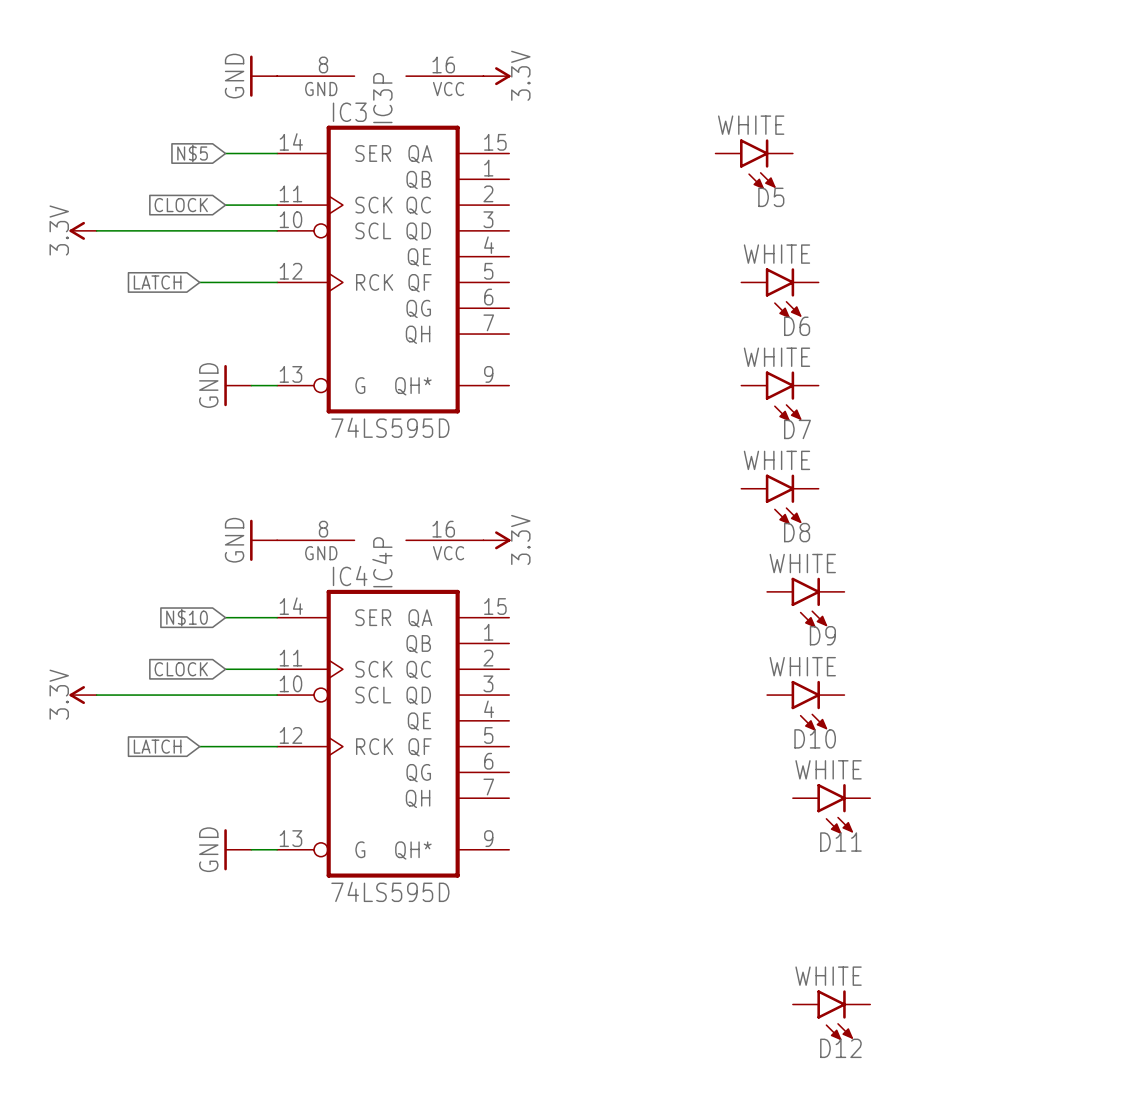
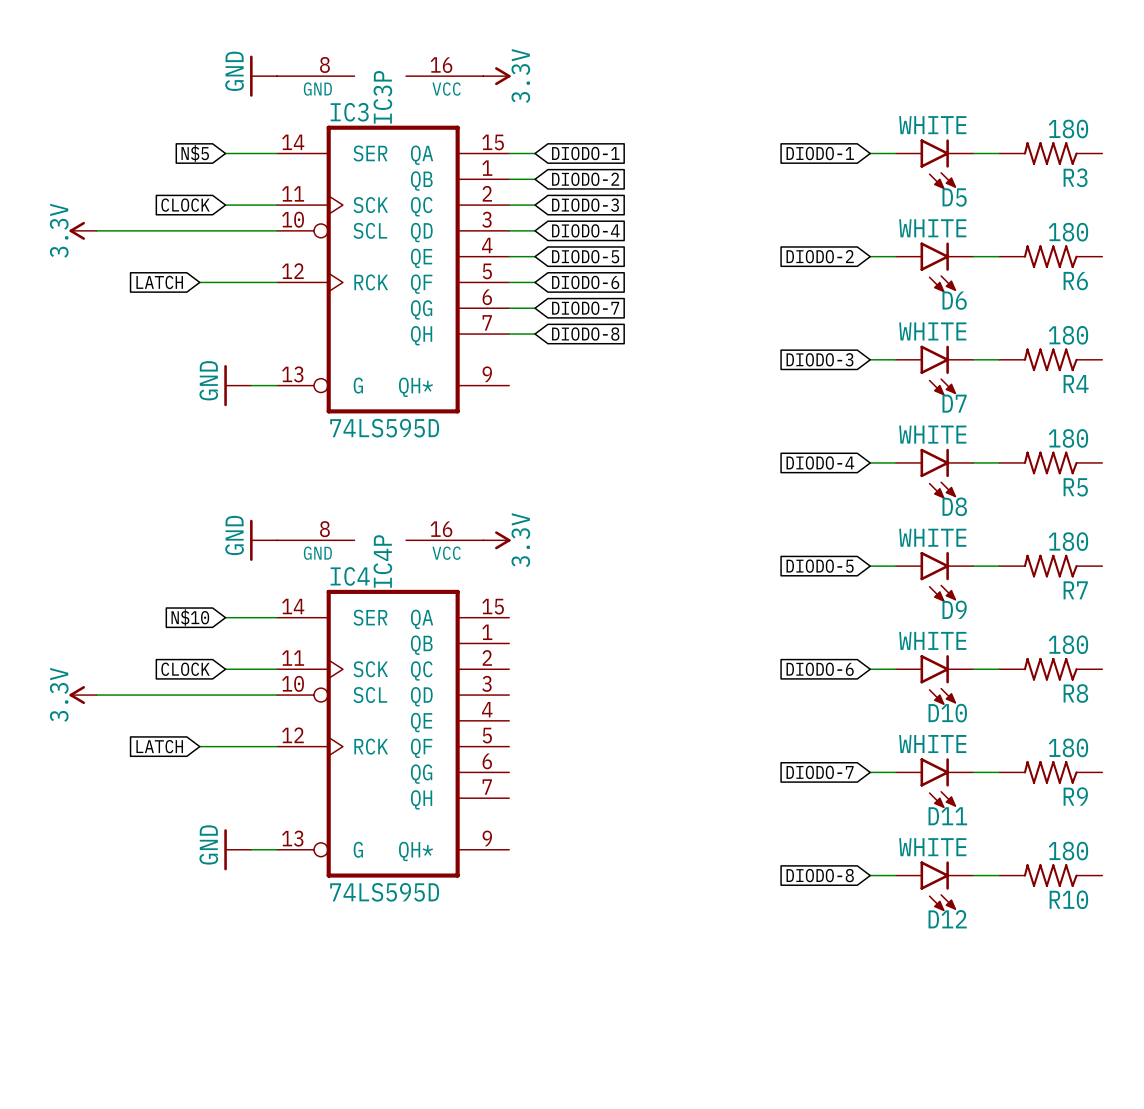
wire: none -> (509, 153) (535, 153)
global label: none -> DIODO-1 (585, 153)
global label: none -> DIODO-1 (820, 153)
wire: none -> (870, 153) (896, 153)
wire: none -> (973, 153) (999, 153)
R3: none -> 180 (1050, 153)
D5 position: (754, 164) -> (934, 164)
wire: none -> (509, 179) (535, 179)
global label: none -> DIODO-2 (585, 179)
wire: none -> (509, 205) (535, 205)
global label: none -> DIODO-3 (585, 205)
wire: none -> (509, 230) (535, 230)
global label: none -> DIODO-4 (585, 230)
wire: none -> (509, 256) (535, 256)
global label: none -> DIODO-5 (585, 256)
global label: none -> DIODO-2 (820, 256)
wire: none -> (870, 256) (896, 256)
wire: none -> (973, 256) (999, 256)
R6: none -> 180 (1050, 256)
wire: none -> (509, 282) (535, 282)
global label: none -> DIODO-6 (585, 282)
D6 position: (779, 293) -> (934, 267)
wire: none -> (509, 308) (535, 308)
global label: none -> DIODO-7 (585, 308)
wire: none -> (509, 334) (535, 334)
global label: none -> DIODO-8 (585, 334)
global label: none -> DIODO-3 (819, 359)
wire: none -> (870, 359) (896, 359)
wire: none -> (973, 359) (999, 359)
R4: none -> 180 (1050, 359)
D7 position: (779, 396) -> (934, 370)
global label: none -> DIODO-4 (820, 462)
wire: none -> (870, 462) (896, 462)
wire: none -> (973, 462) (999, 462)
R5: none -> 180 (1050, 462)
D8 position: (779, 499) -> (934, 473)
global label: none -> DIODO-5 (820, 566)
wire: none -> (870, 566) (896, 566)
wire: none -> (973, 566) (999, 566)
R7: none -> 180 (1050, 566)
D9 position: (805, 602) -> (934, 576)
global label: none -> DIODO-6 (820, 669)
wire: none -> (870, 669) (896, 669)
wire: none -> (973, 669) (999, 669)
R8: none -> 180 (1050, 669)
D10 position: (805, 705) -> (934, 679)
global label: none -> DIODO-7 (820, 772)
wire: none -> (870, 772) (896, 772)
wire: none -> (973, 772) (999, 772)
R9: none -> 180 (1050, 772)
D11 position: (831, 808) -> (934, 783)
global label: none -> DIODO-8 (820, 875)
wire: none -> (870, 875) (896, 875)
wire: none -> (973, 875) (999, 875)
R10: none -> 180 (1050, 875)
D12 position: (831, 1015) -> (934, 886)

